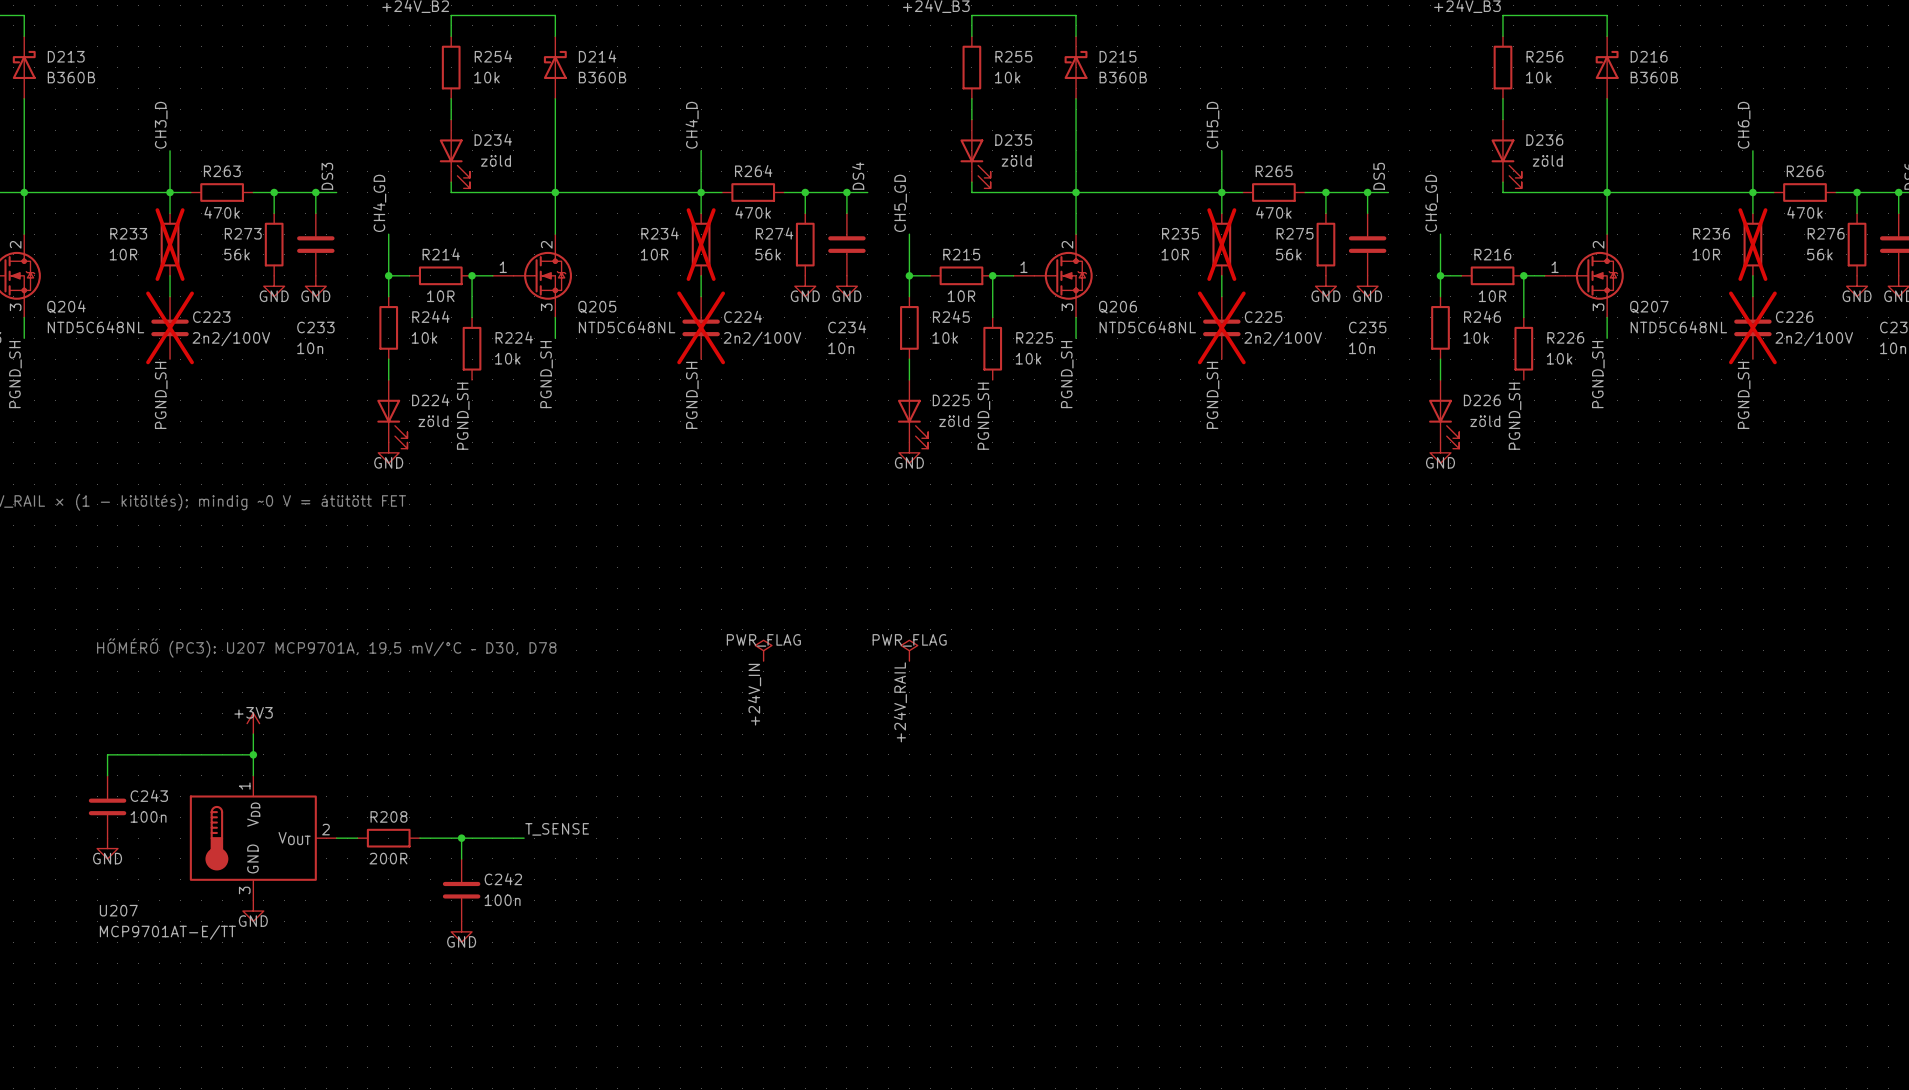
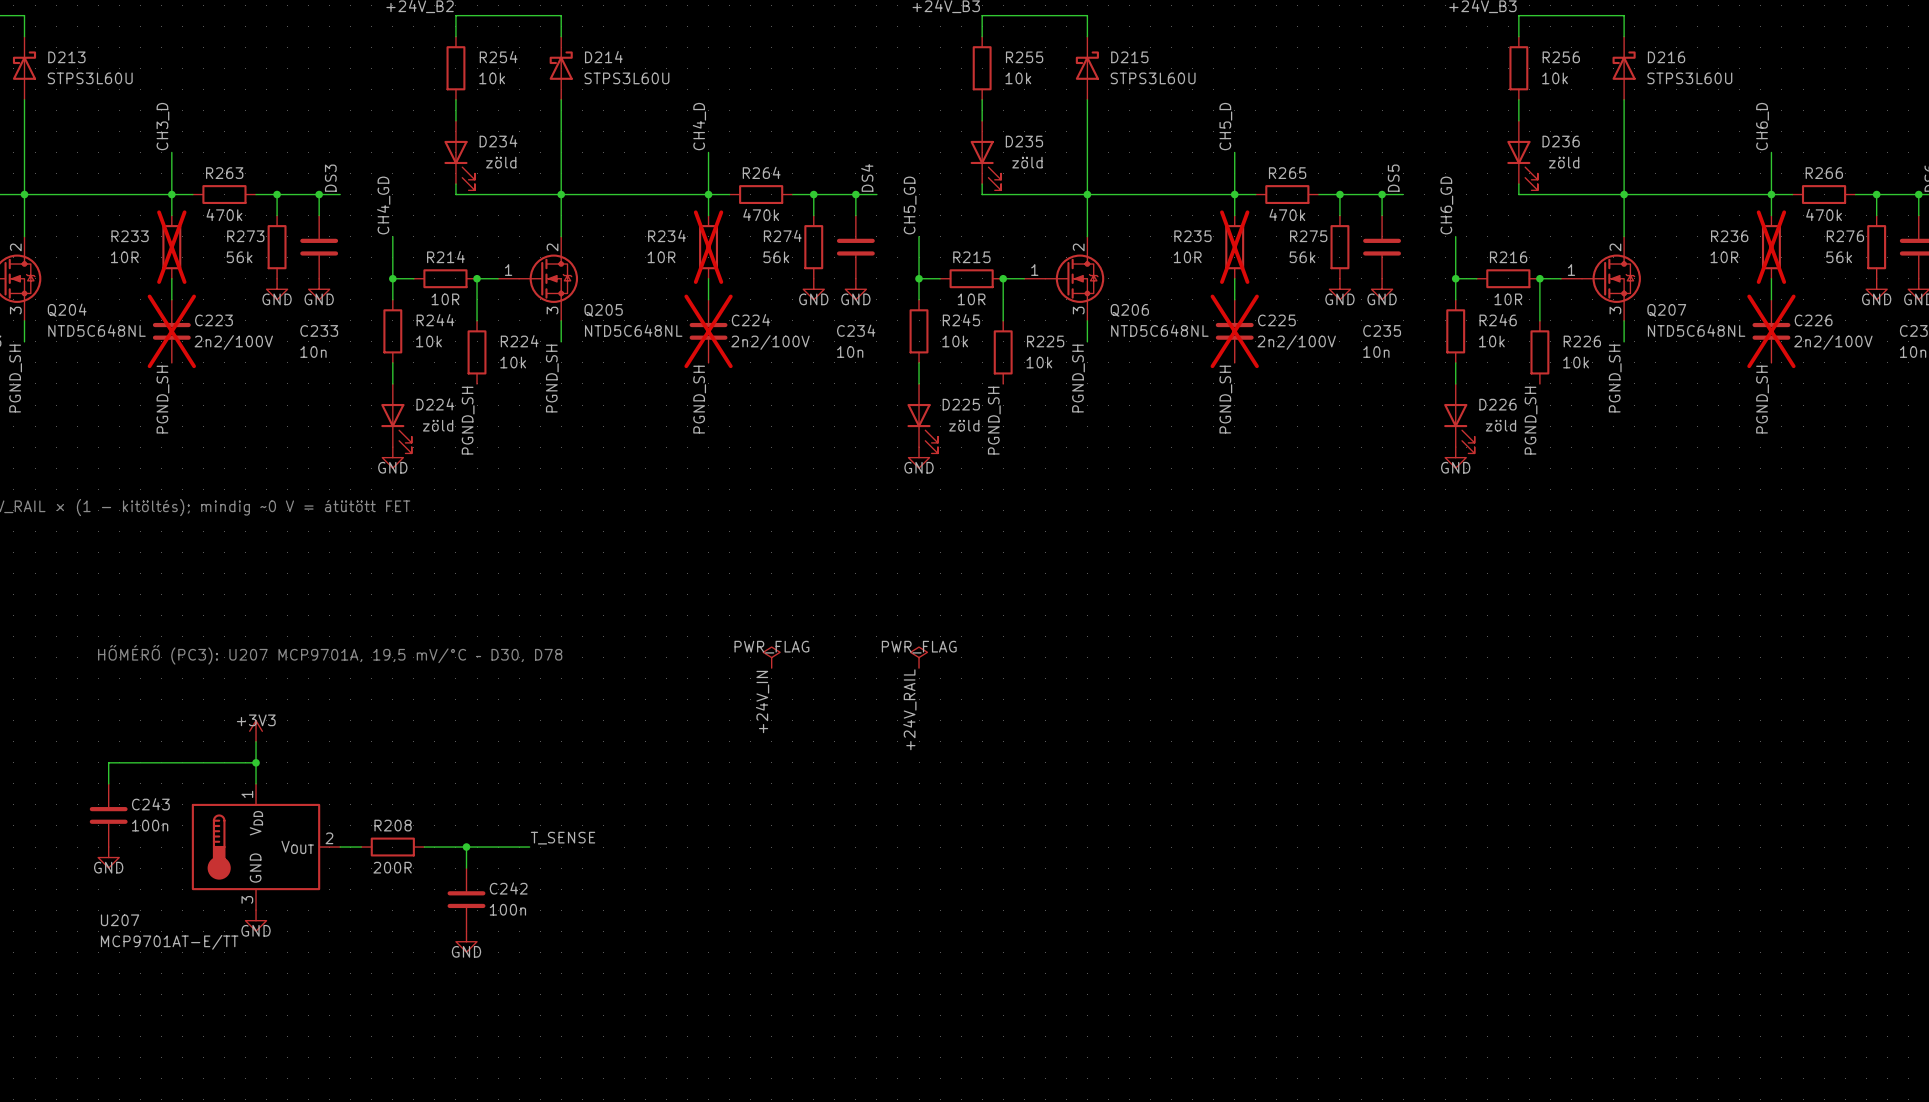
D213 value: B360B (71, 77) -> STPS3L60U (90, 78)
D214 value: B360B (602, 77) -> STPS3L60U (626, 78)
D215 value: B360B (1123, 77) -> STPS3L60U (1153, 78)
D216 value: B360B (1654, 77) -> STPS3L60U (1689, 78)

